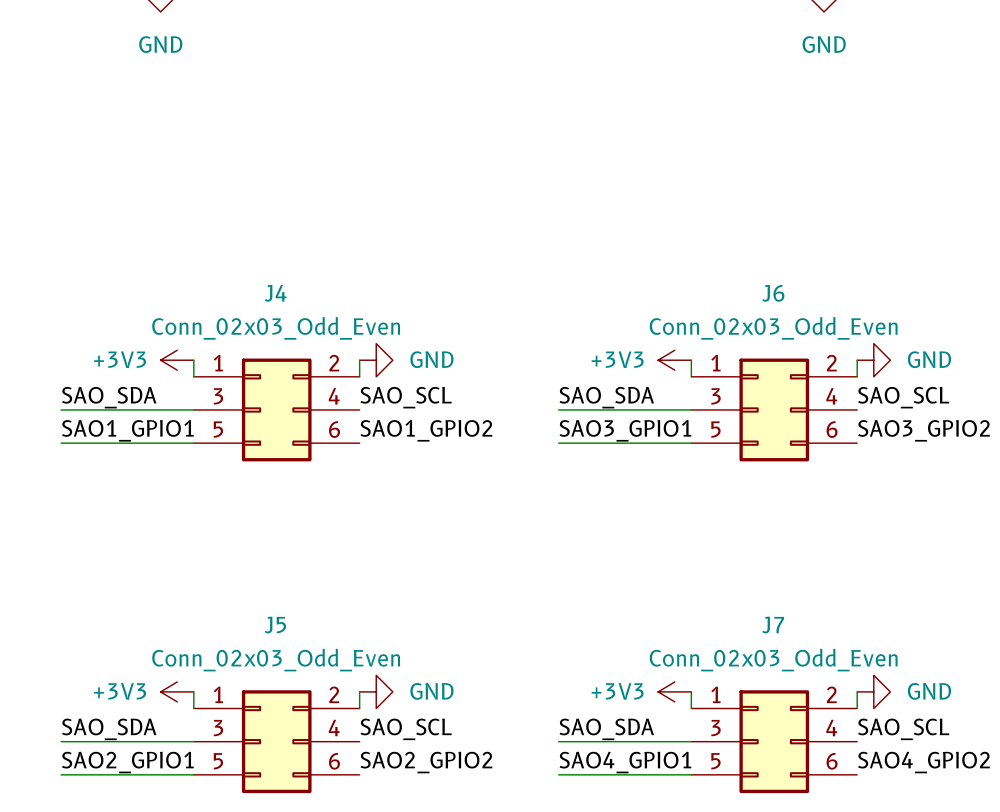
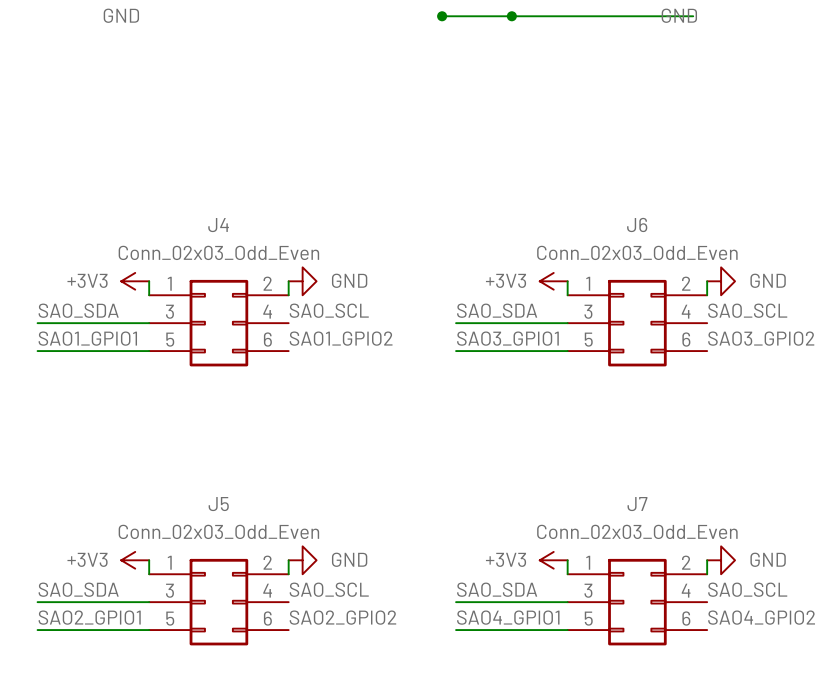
wire: none -> (442, 16) (693, 16)
junction: none -> (442, 16)
junction: none -> (511, 16)

